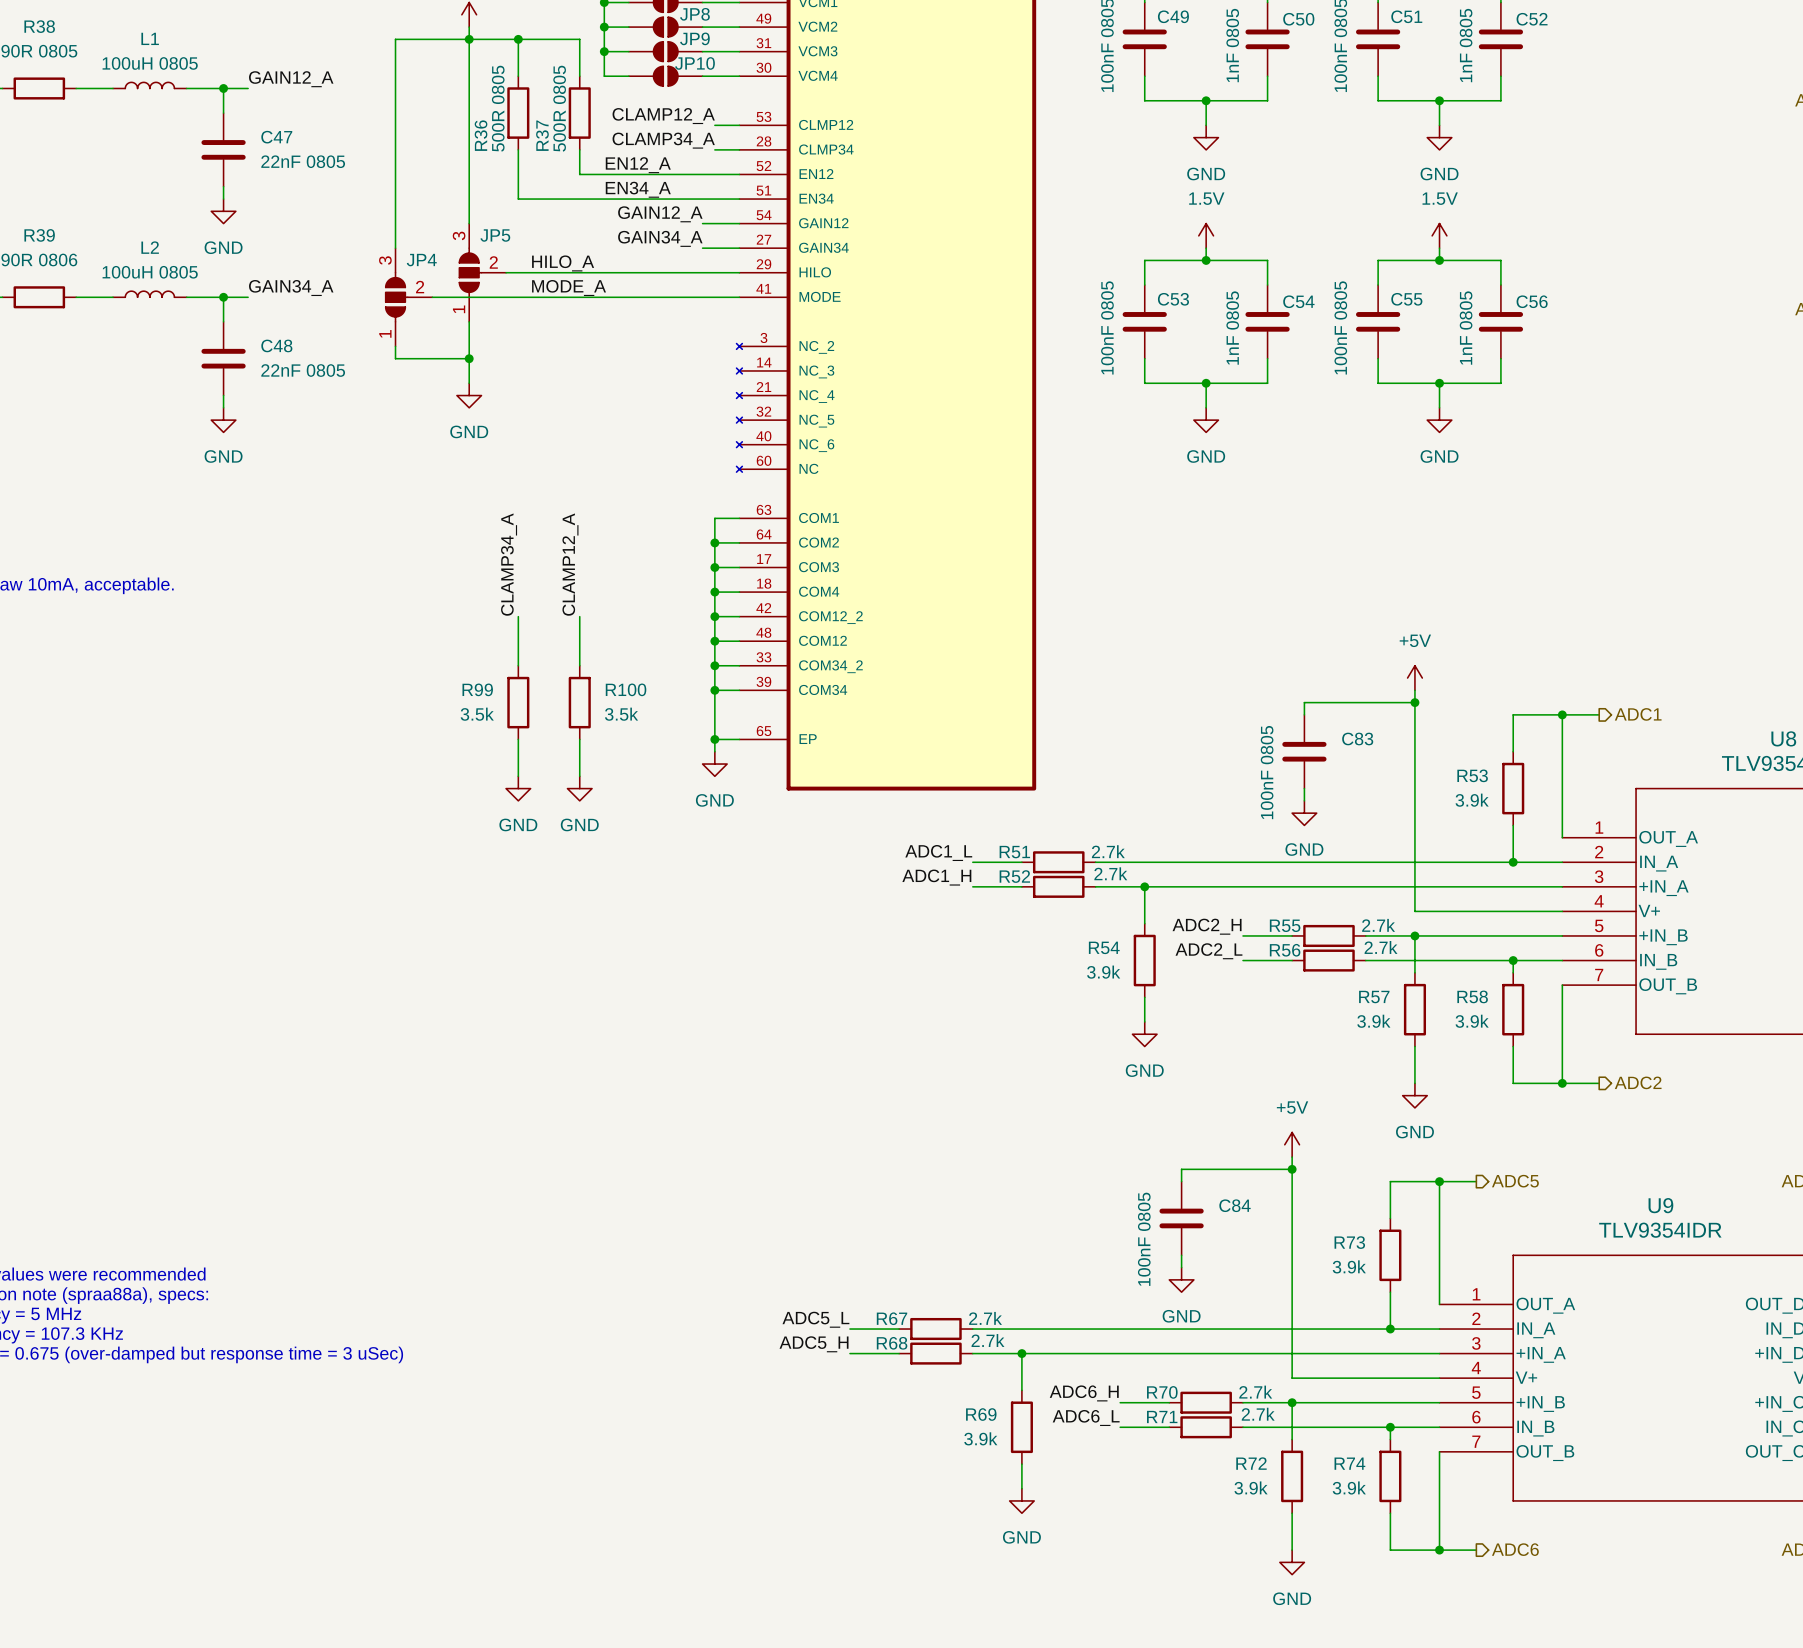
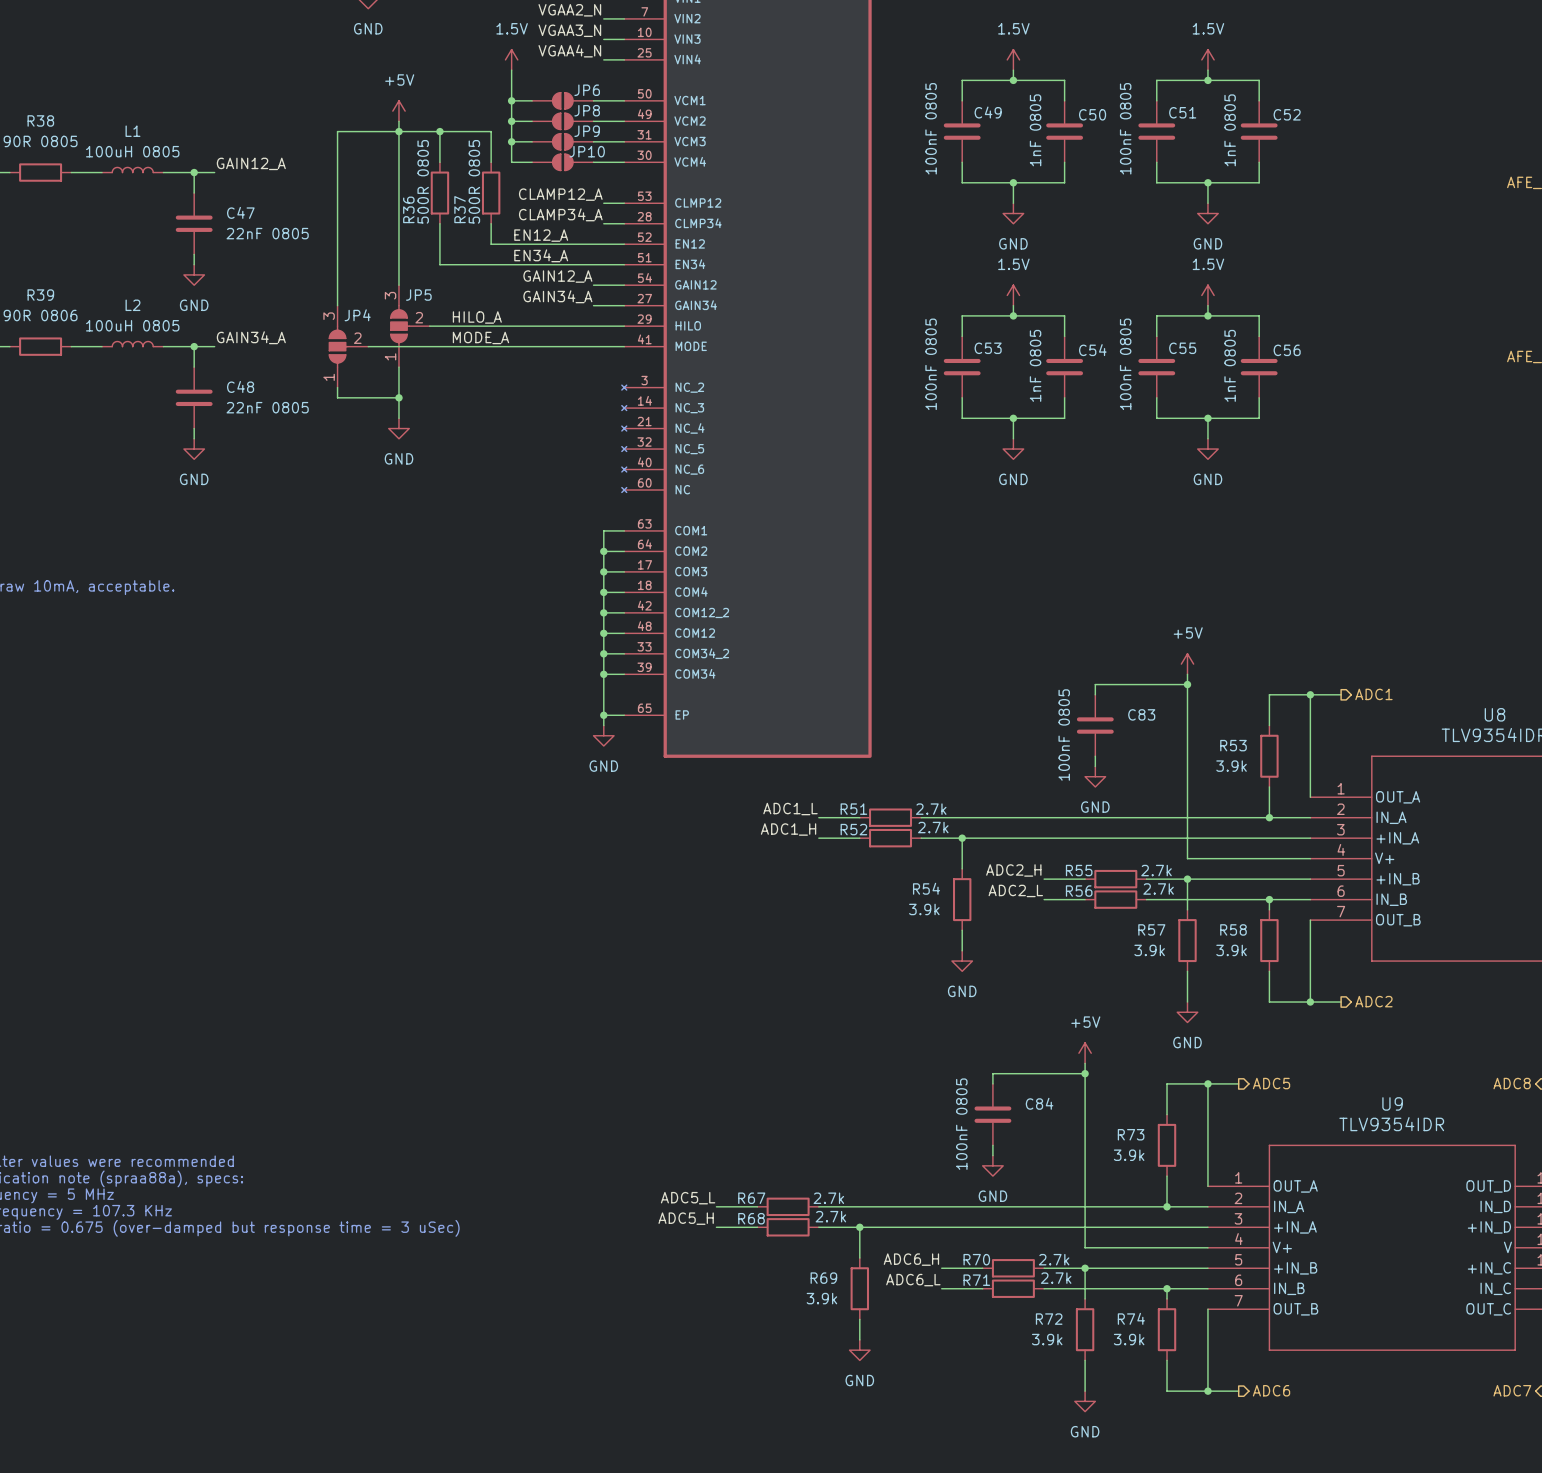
label: CLAMP34_A (509, 564) -> none
label: CLAMP12_A (570, 564) -> none
wire: (518, 616) (518, 665) -> none
wire: (579, 616) (579, 665) -> none
R99: 3.5k (518, 702) -> none
R100: 3.5k (579, 702) -> none
wire: (518, 739) (518, 776) -> none
wire: (579, 739) (579, 776) -> none
power symbol: GND (518, 788) -> none
power symbol: GND (579, 788) -> none

